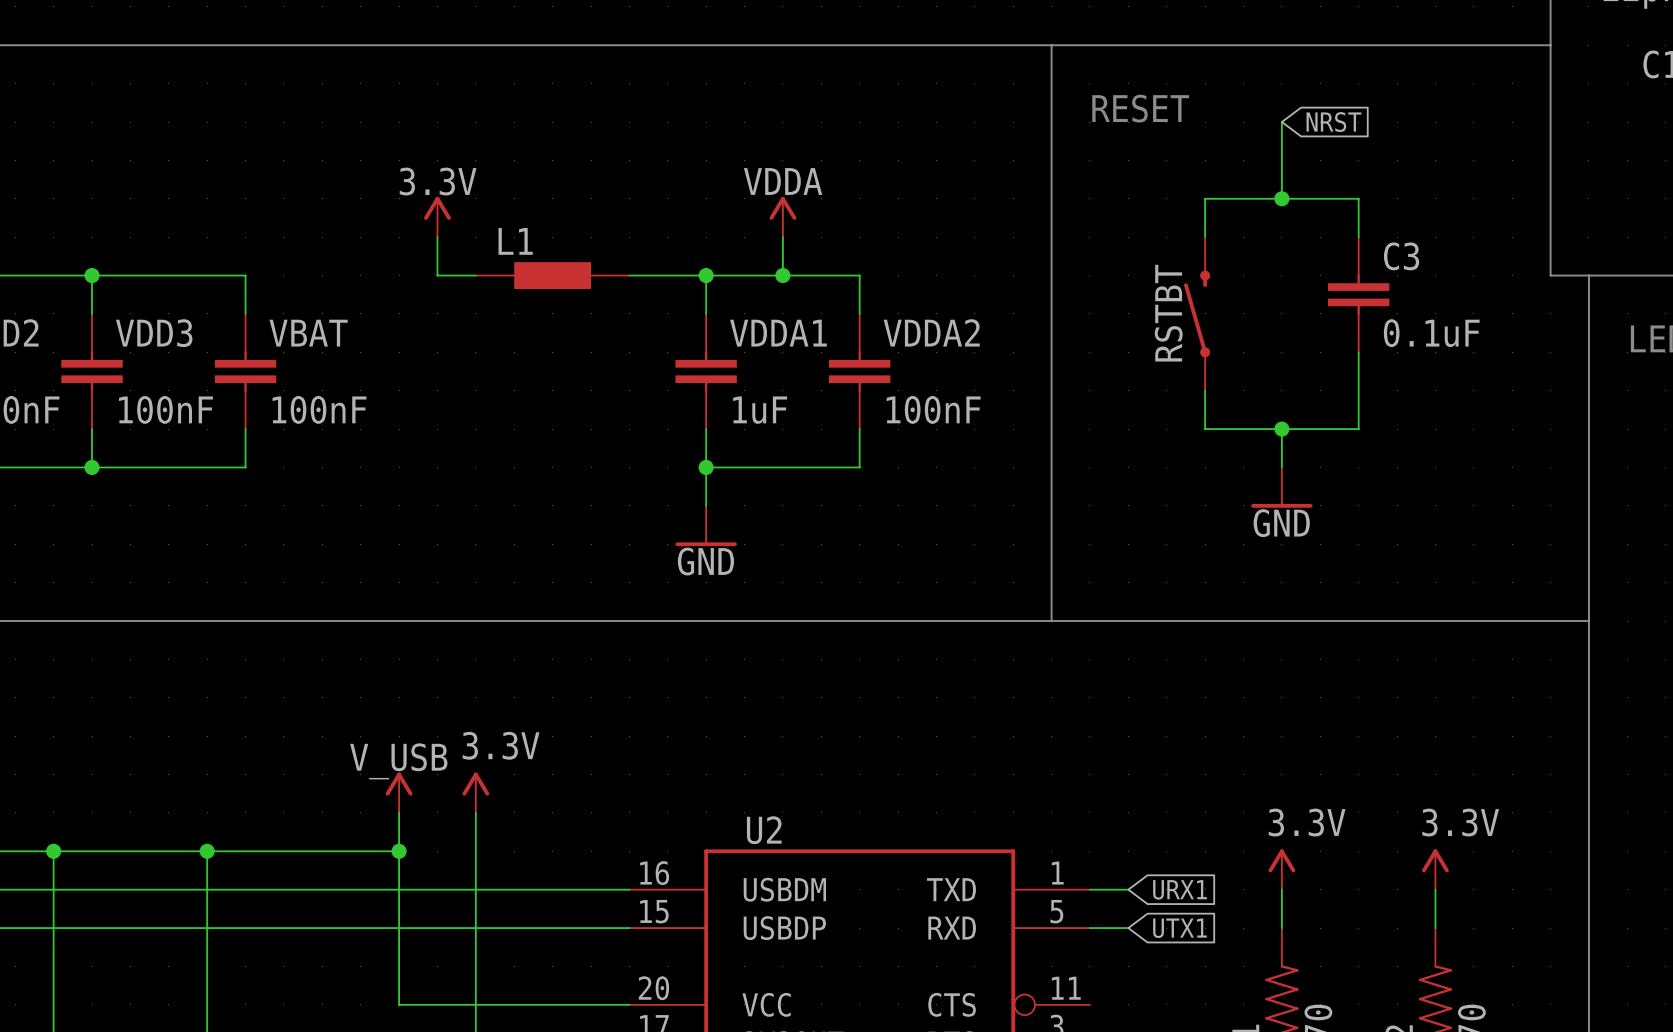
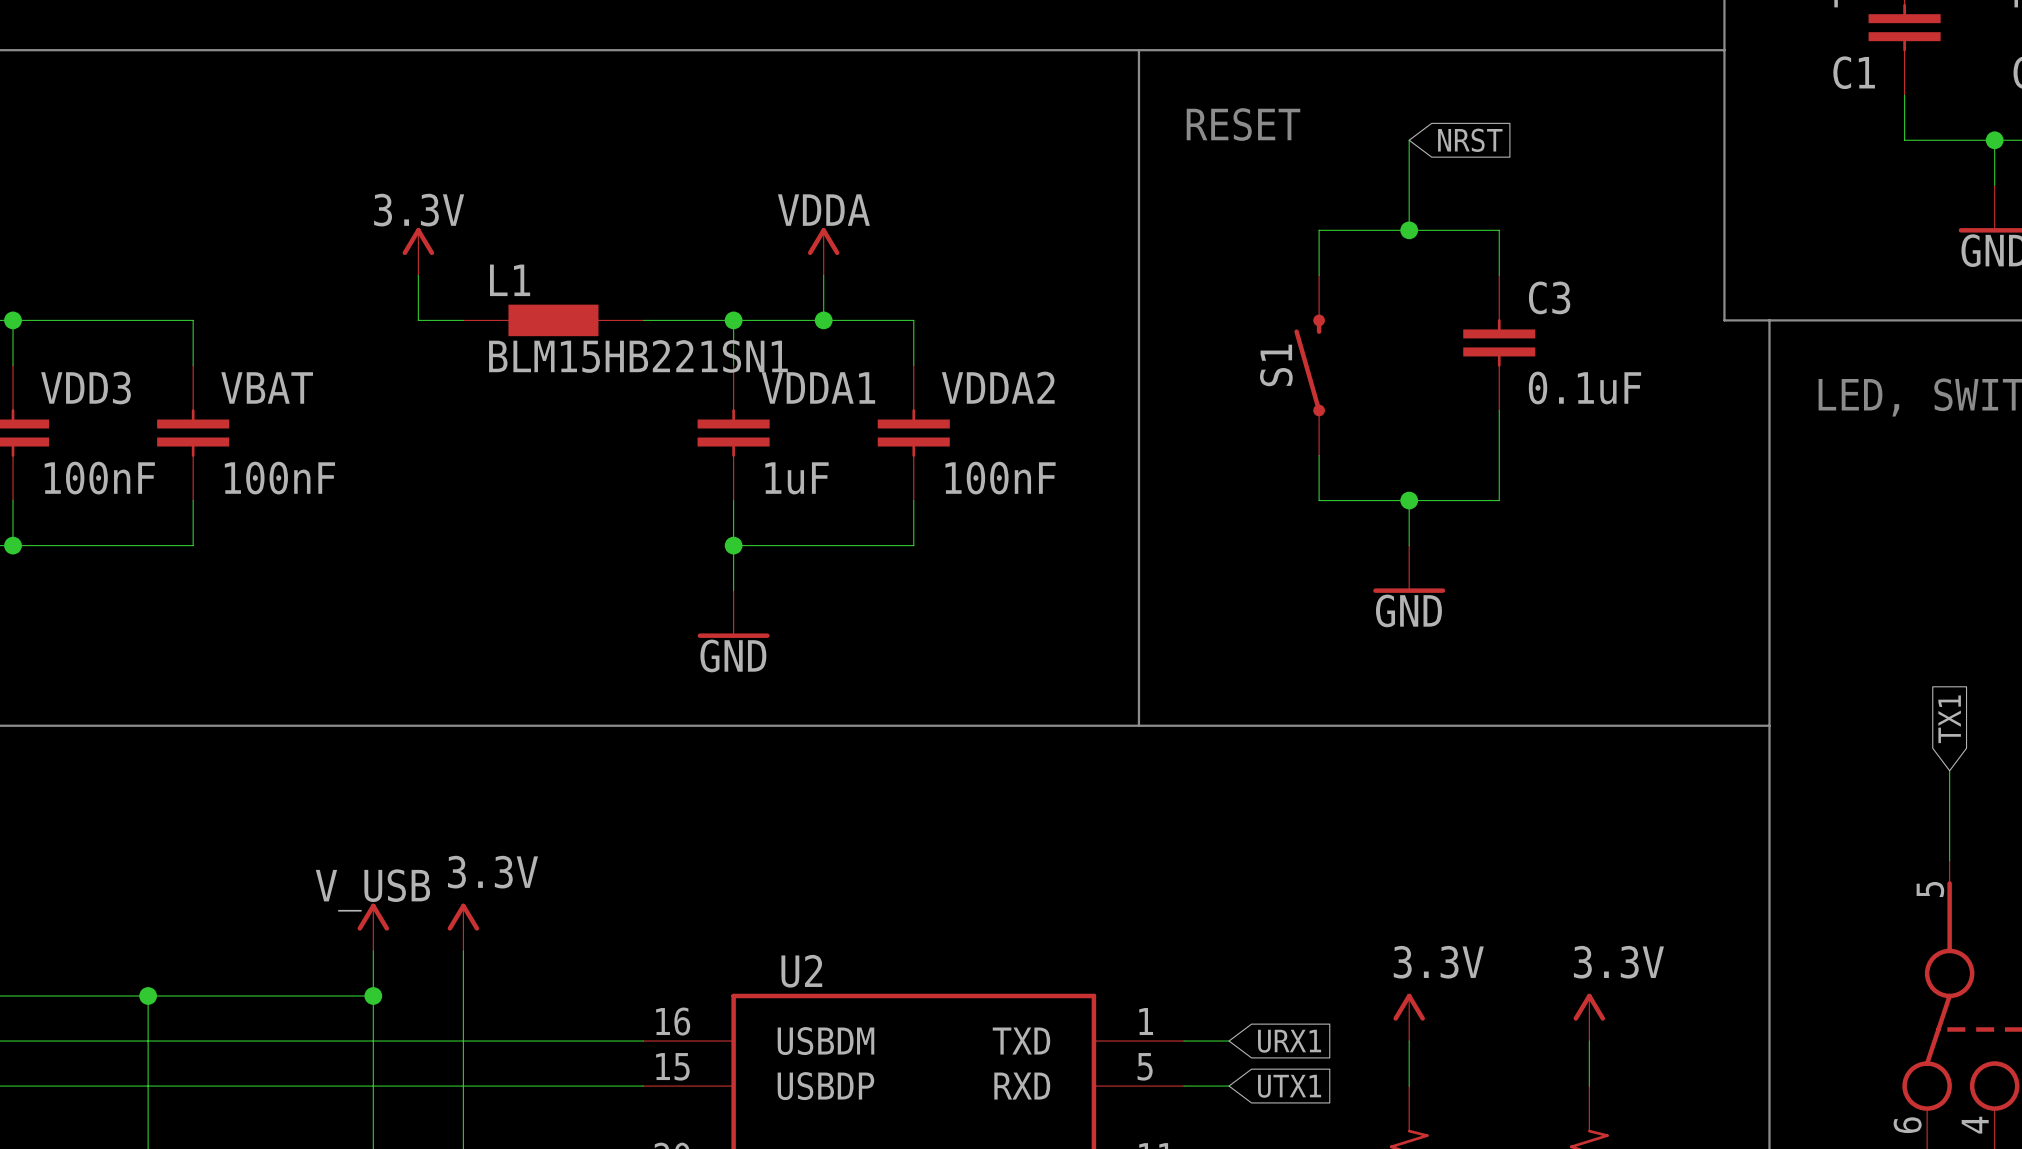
L1 value: none -> BLM15HB221SN1 (638, 356)
RSTBT name: RSTBT (1168, 313) -> S1 (1276, 365)

